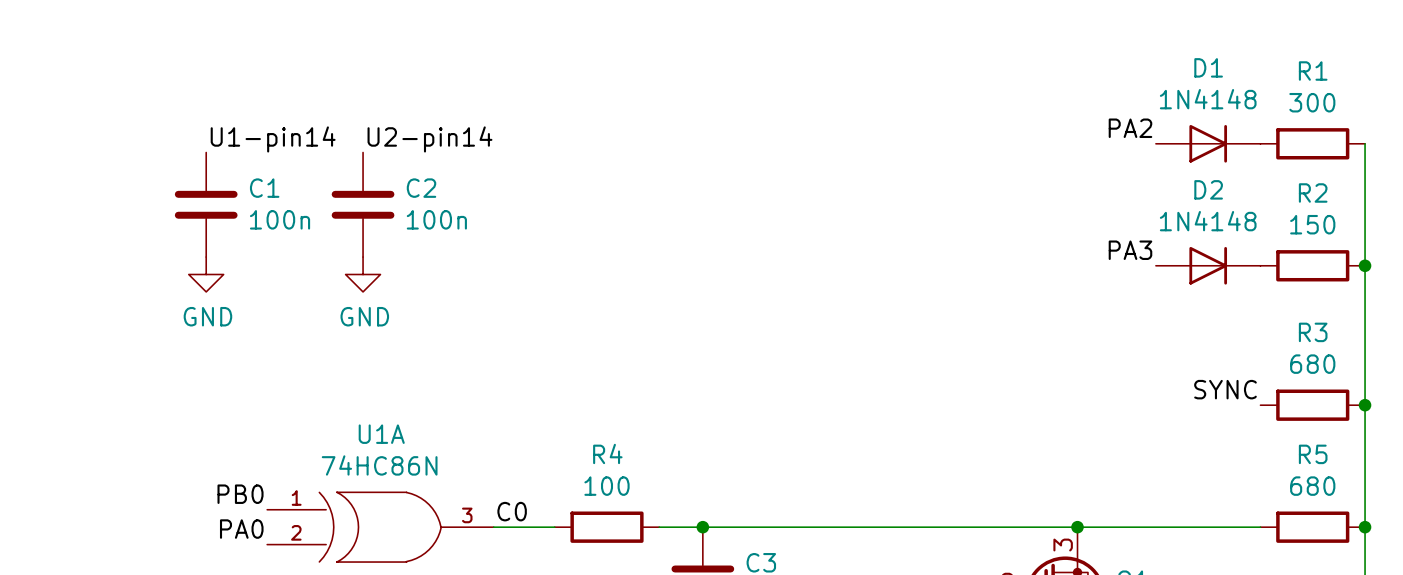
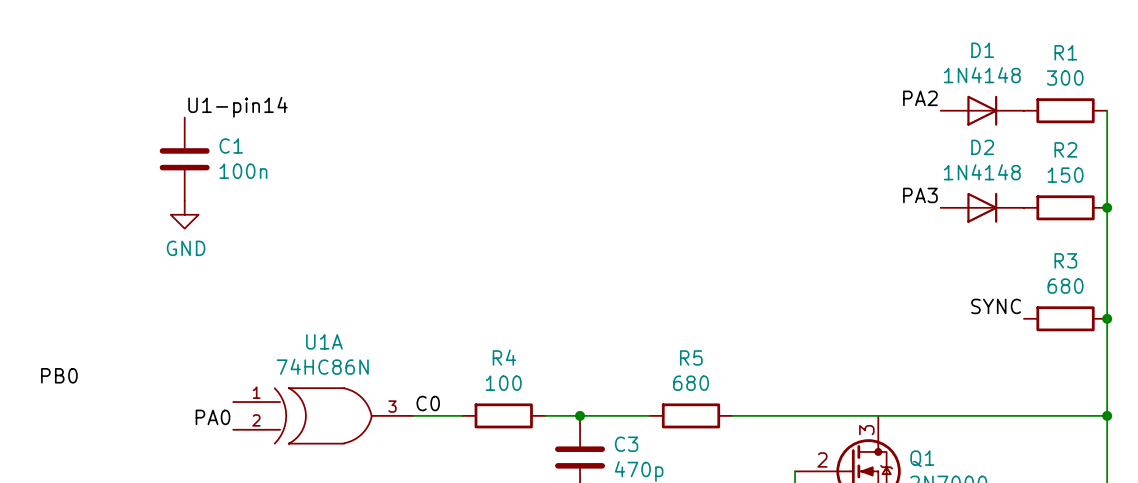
label: U2-pin14 (429, 139) -> none
C2: 100n (363, 204) -> none
power symbol: GND (363, 274) -> none
label position: PB0 (240, 494) -> PB0 (59, 375)
wire: (789, 527) (894, 527) -> none
junction: (1077, 527) -> none
wire: none -> (1023, 415) (1107, 415)
R5 position: (1312, 527) -> (691, 415)

